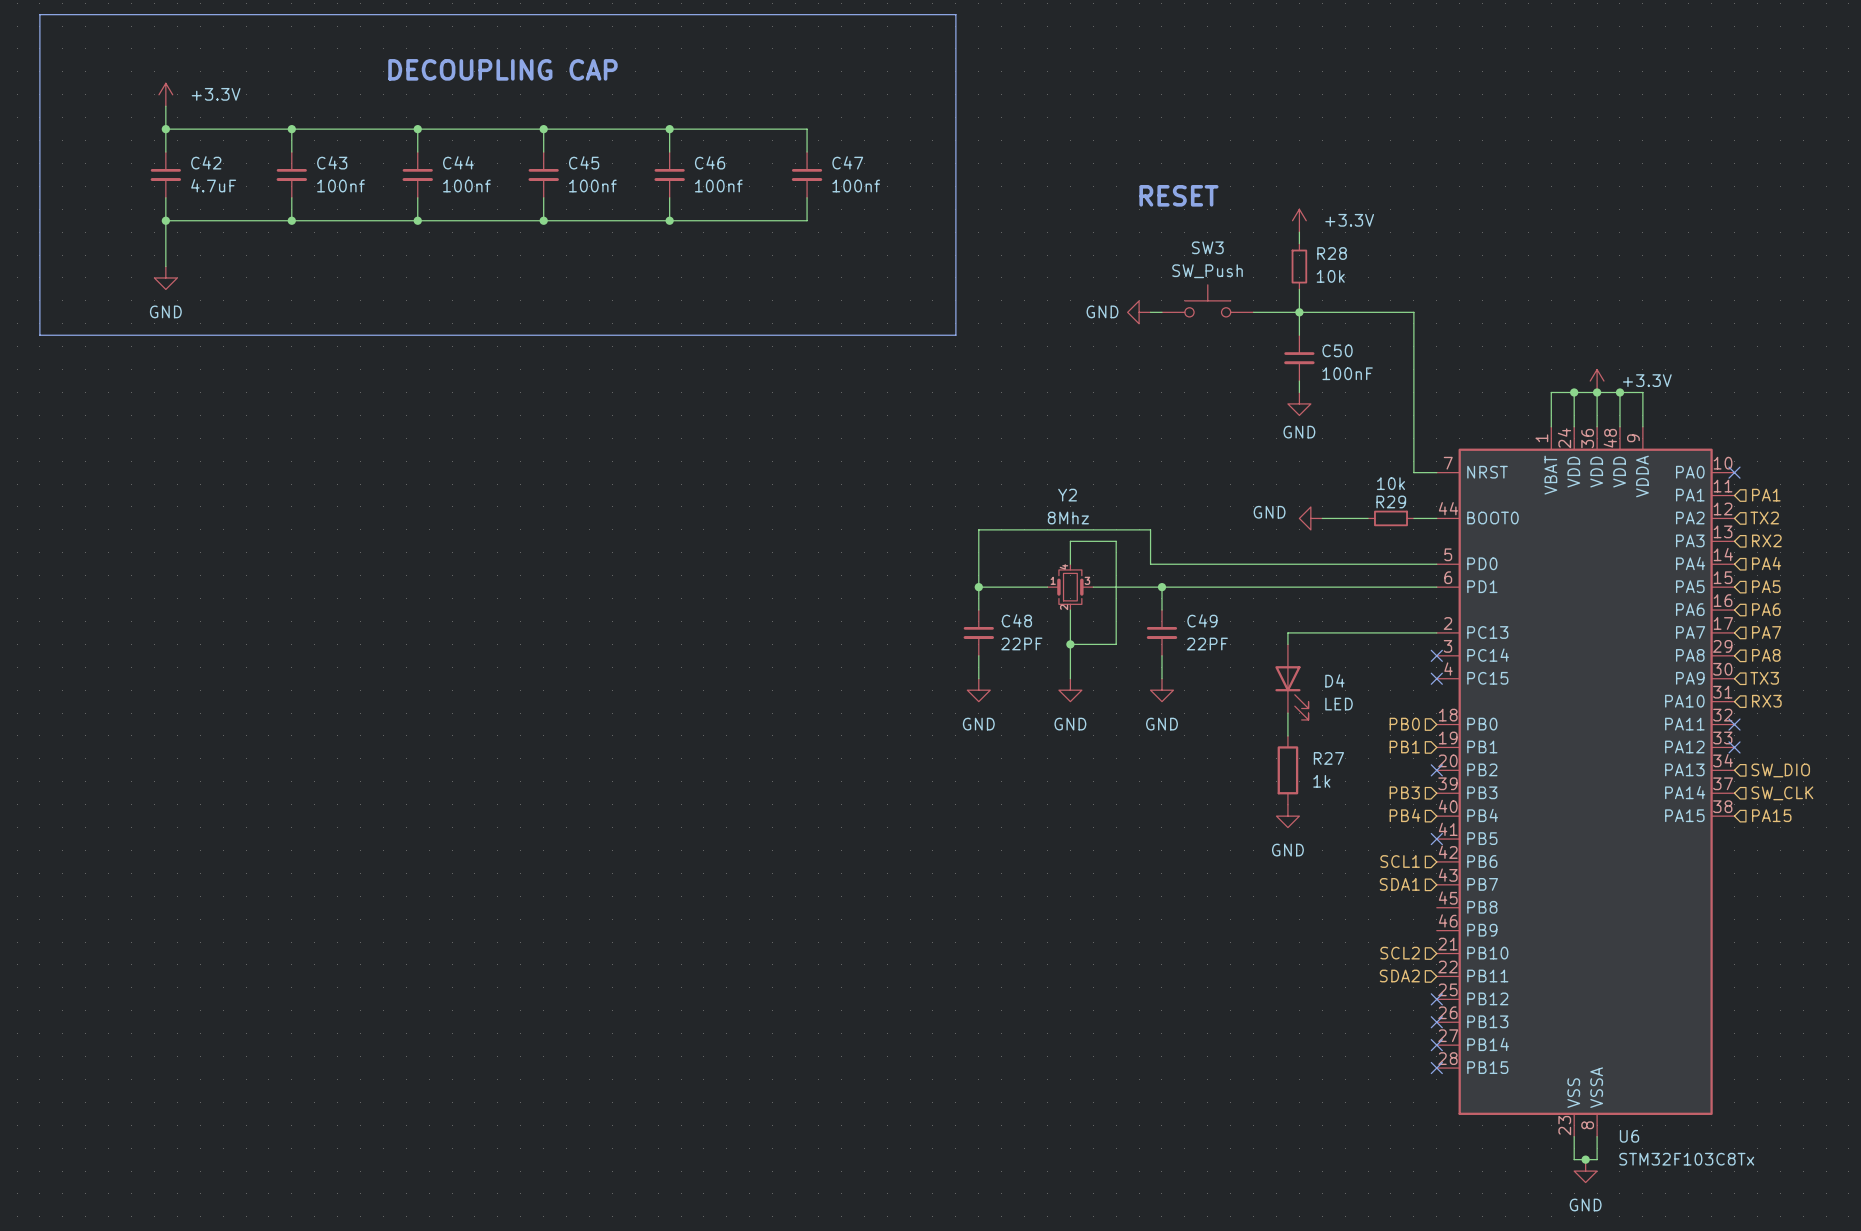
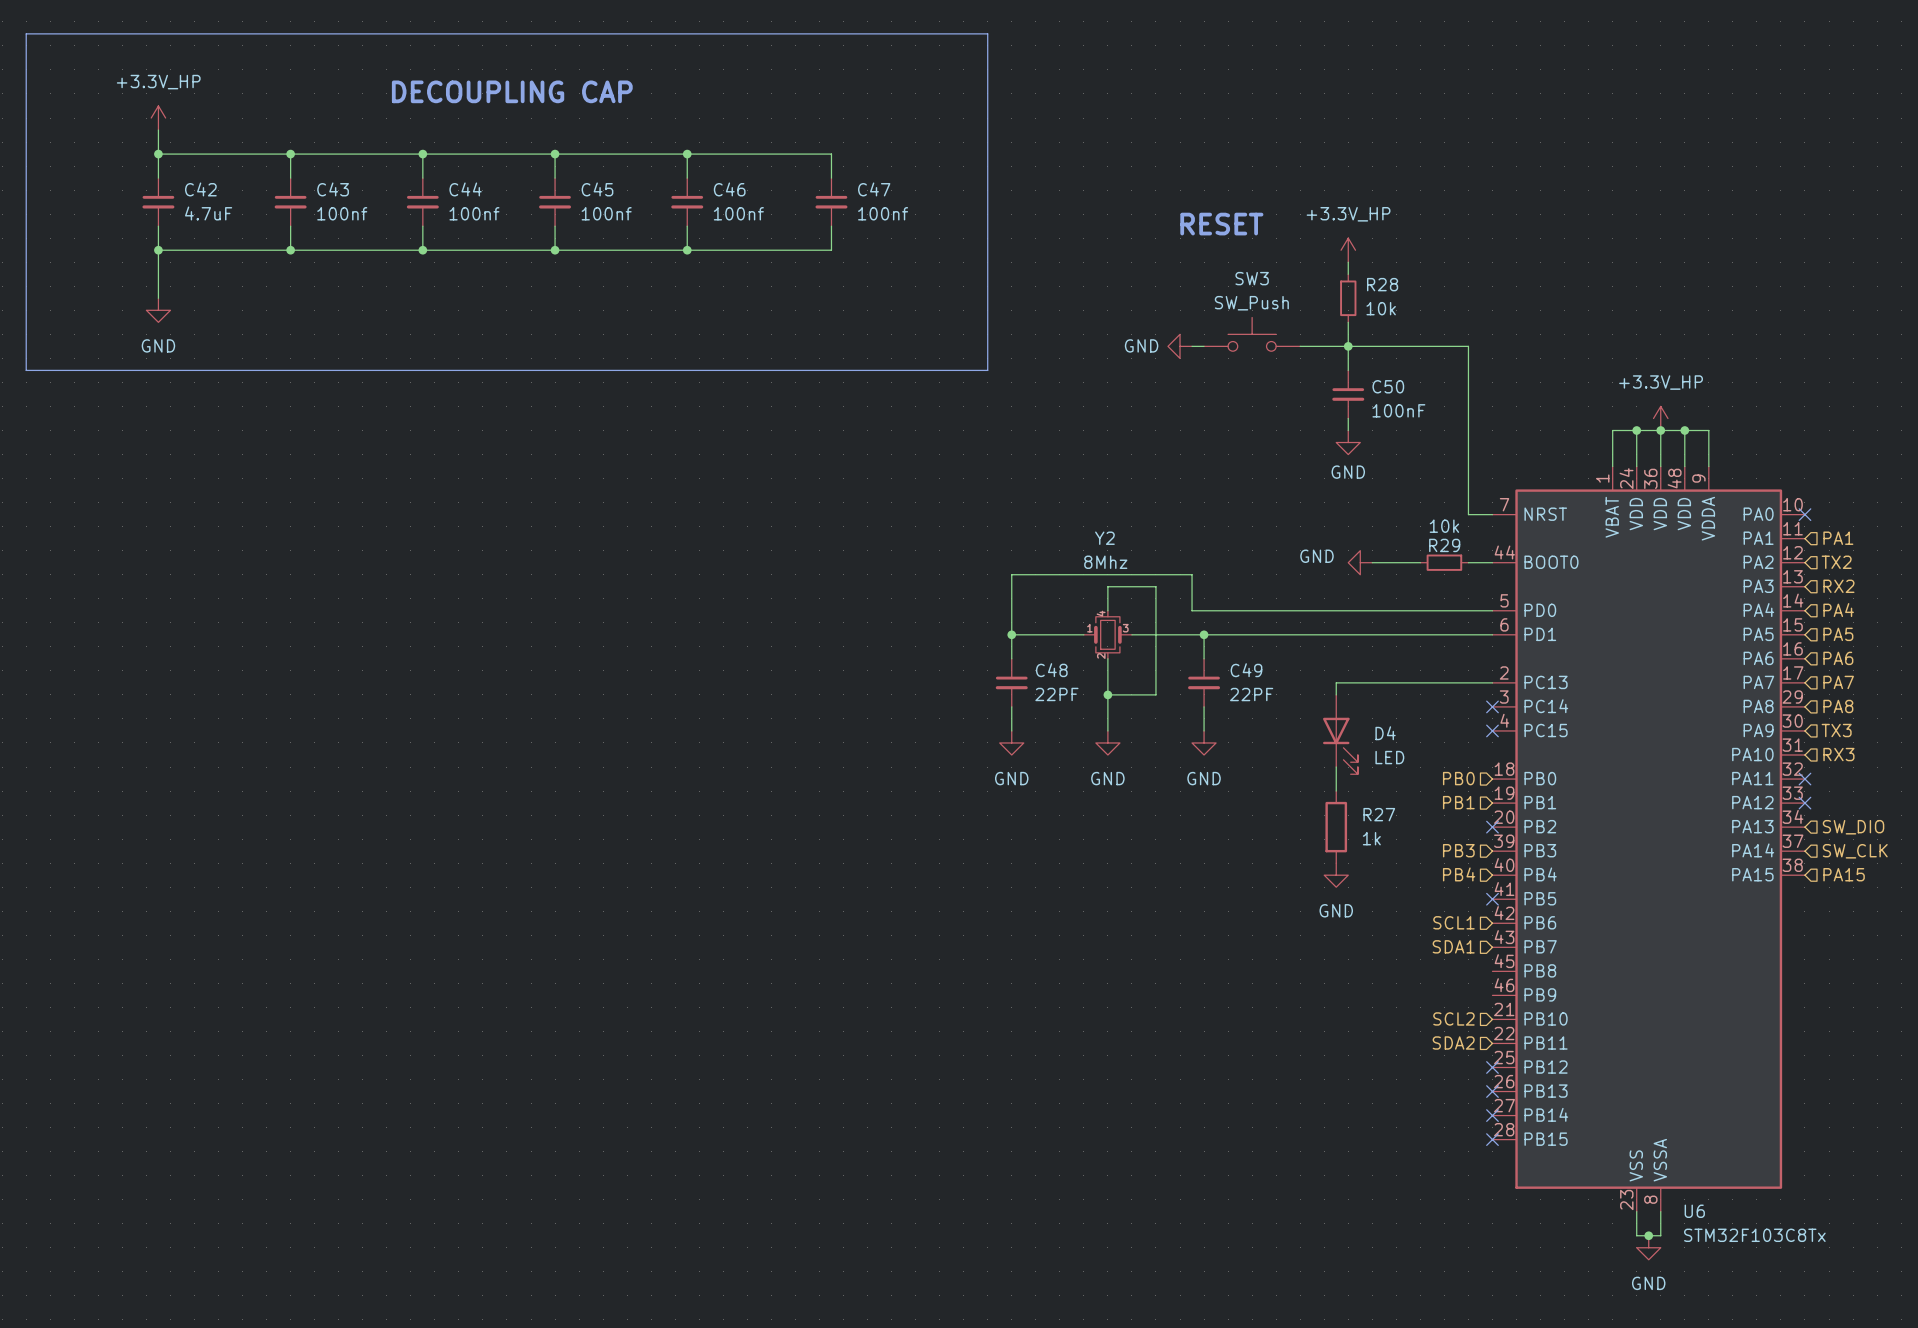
power symbol: +3.3V (165, 94) -> +3.3V_HP (158, 118)
power symbol: +3.3V (1299, 220) -> +3.3V_HP (1348, 250)
power symbol: +3.3V (1597, 381) -> +3.3V_HP (1660, 418)

